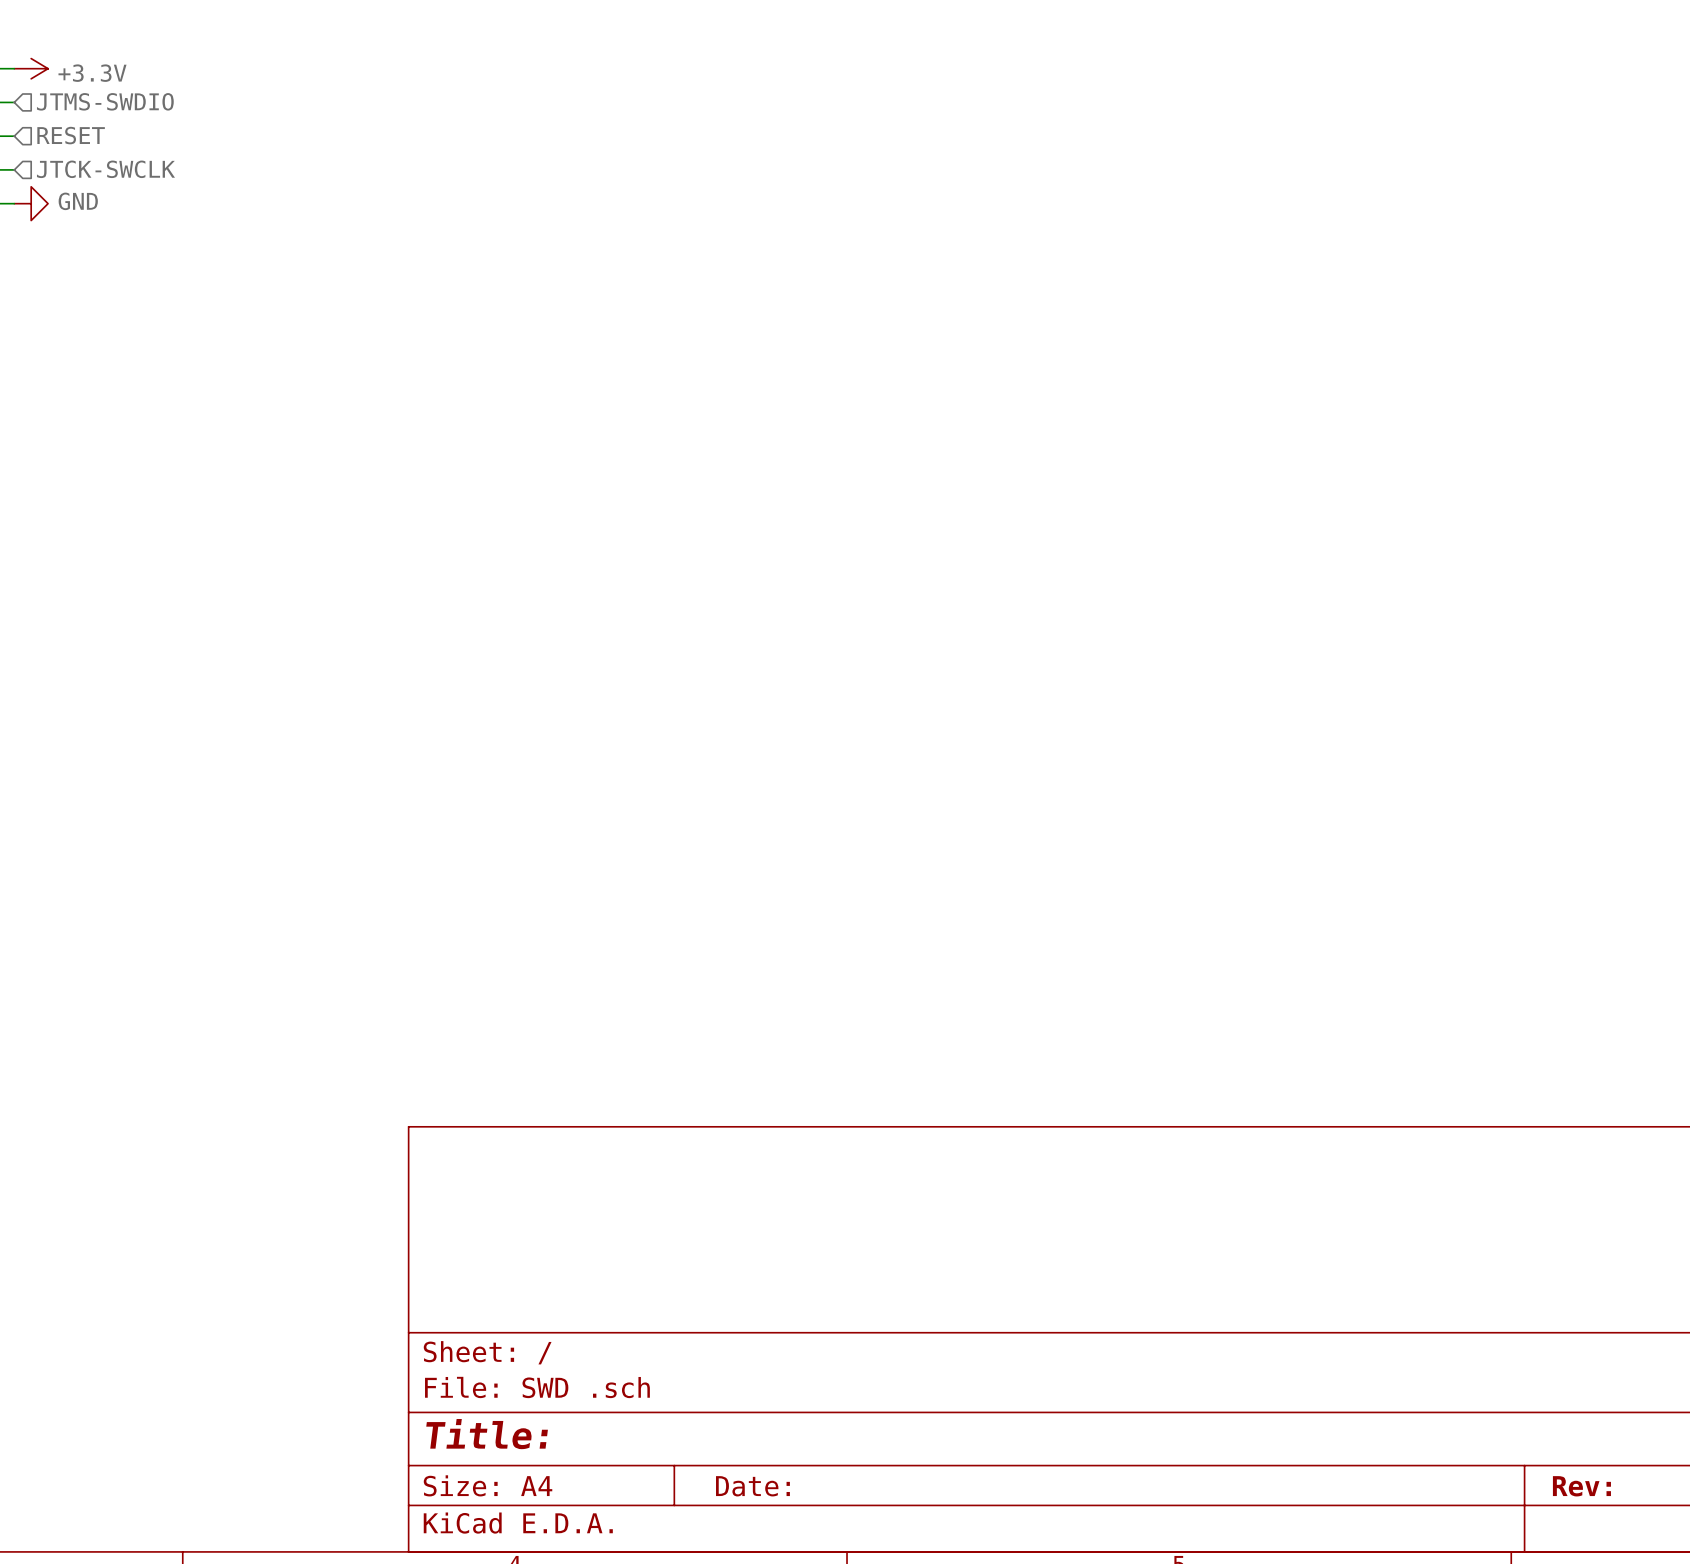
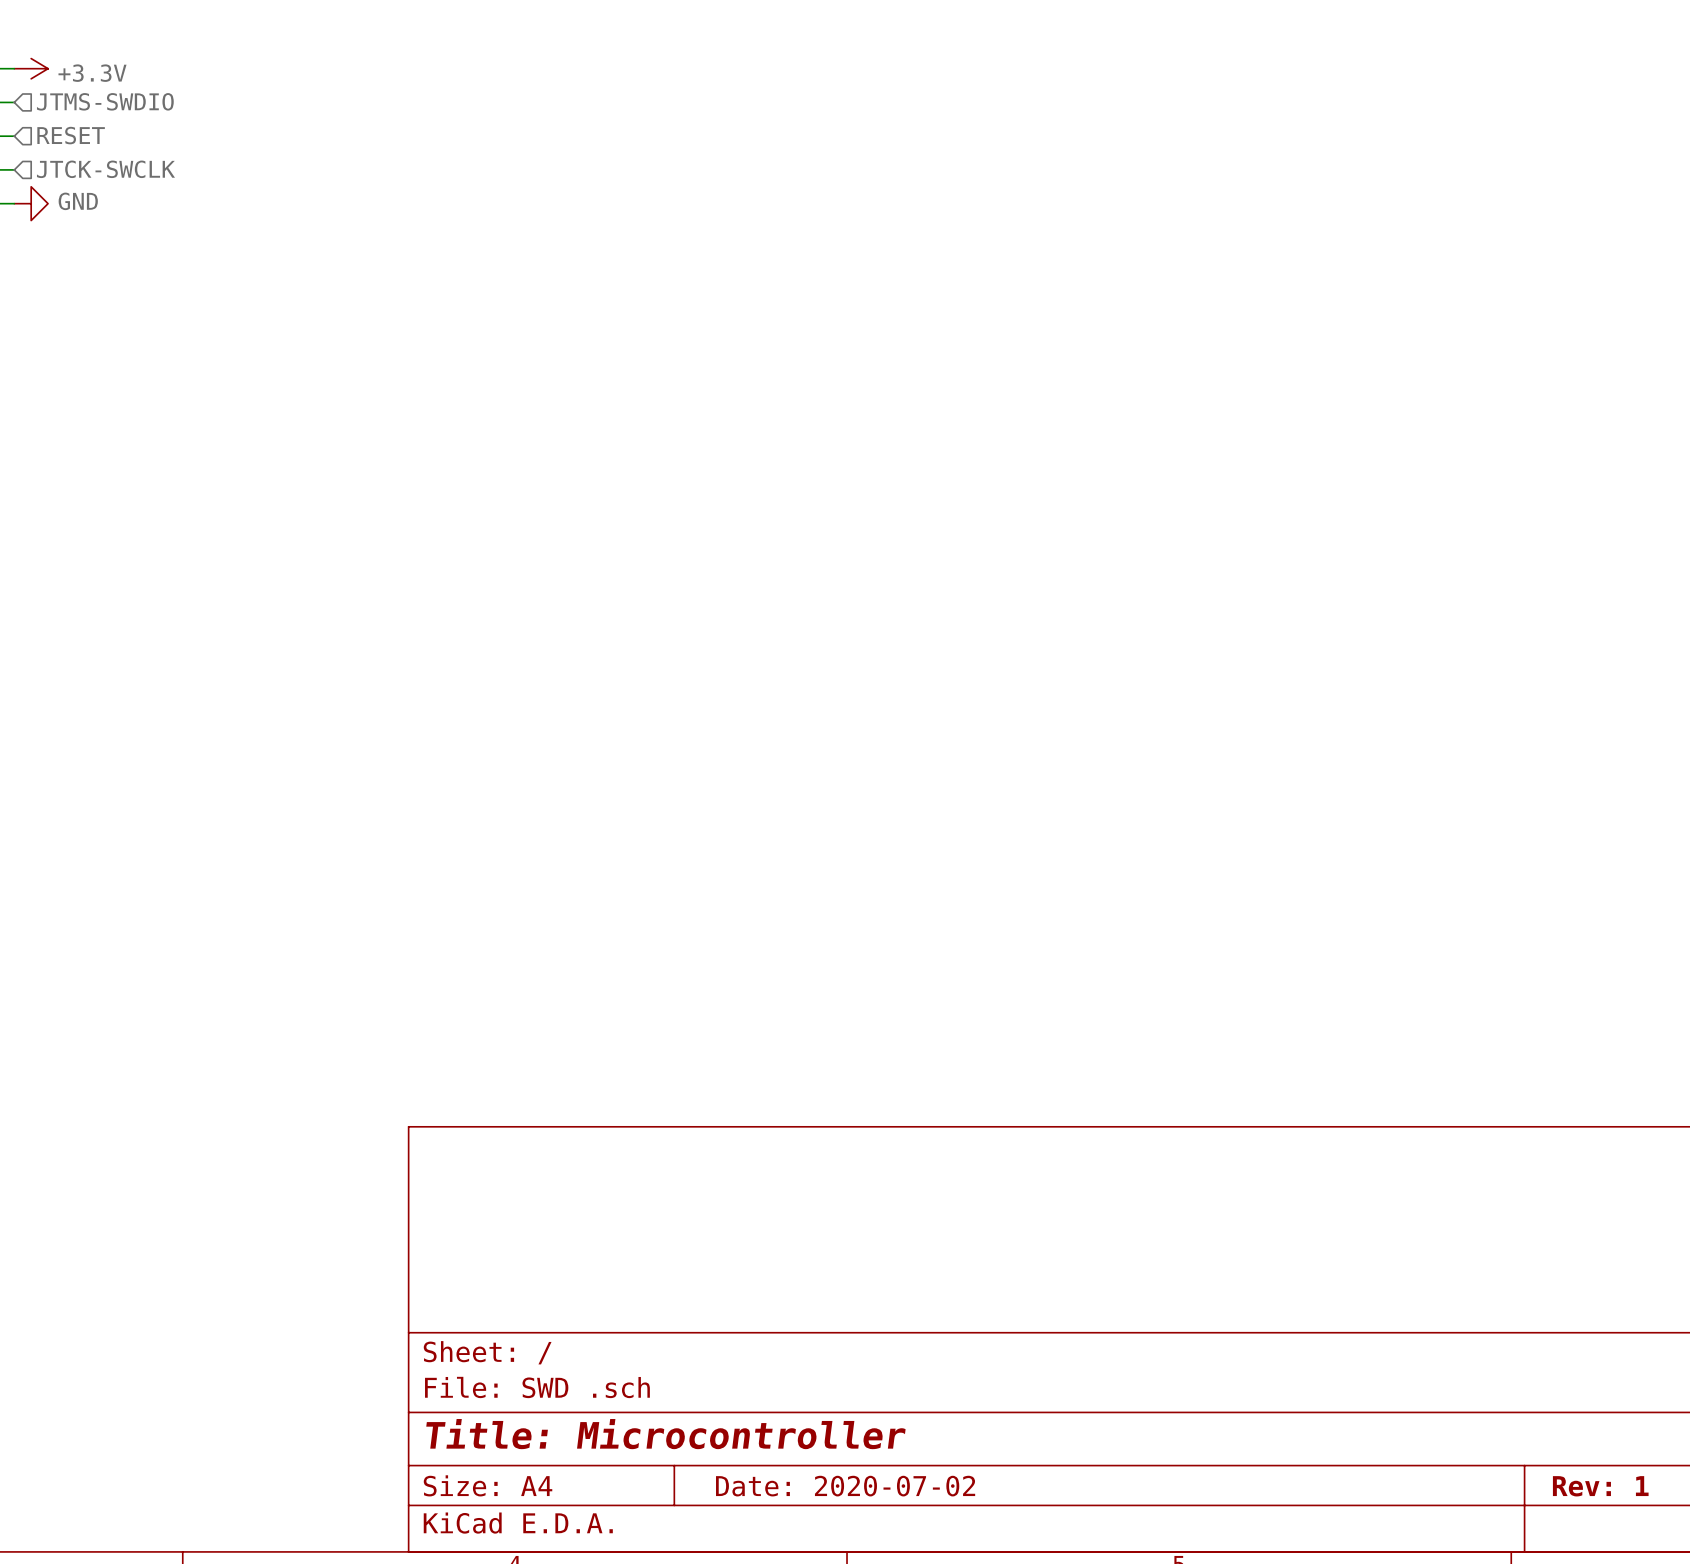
title block: Title: (487, 1434) -> Title: Microcontroller (665, 1434)
title block: Date: (752, 1486) -> Date: 2020-07-02 (845, 1486)
title block: Rev: (1581, 1486) -> Rev: 1 (1600, 1486)

